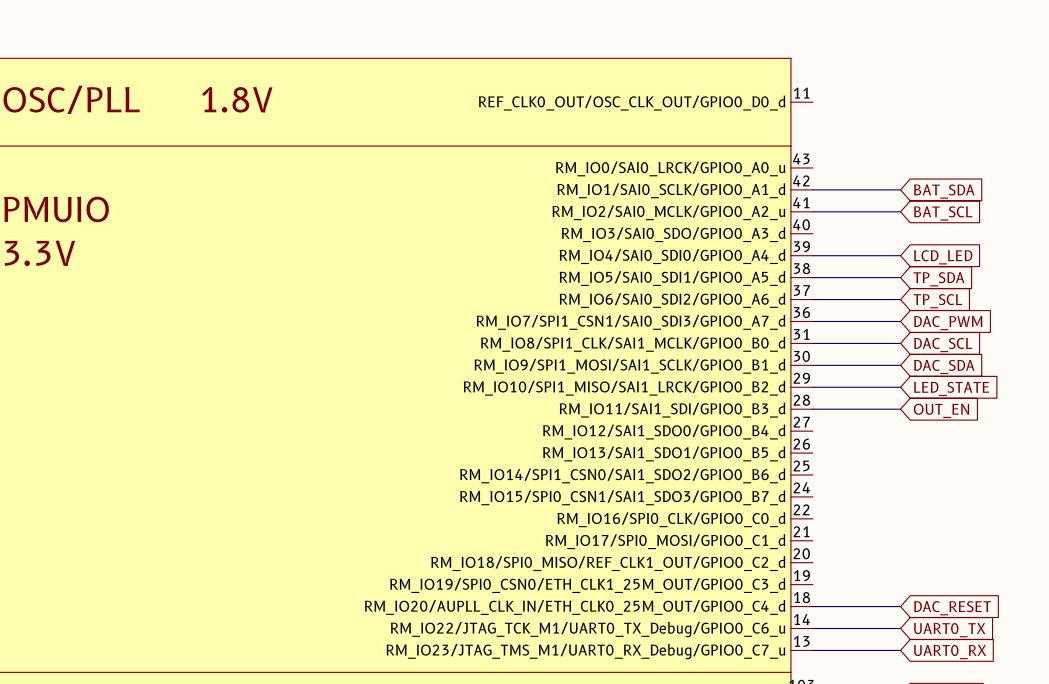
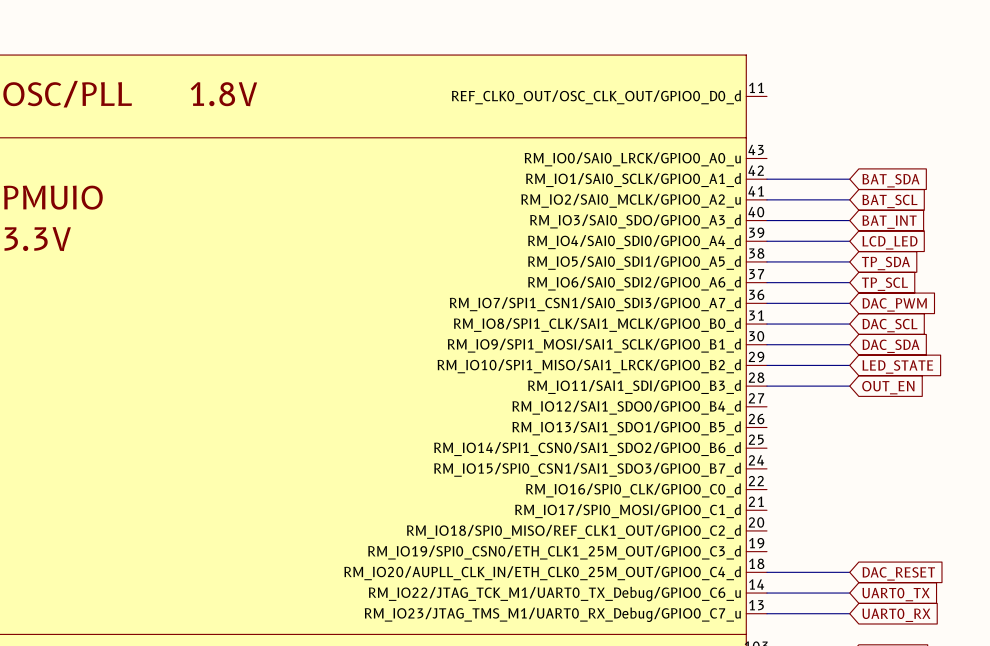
wire: none -> (766, 220) (849, 220)
global label: none -> BAT_INT (889, 222)

